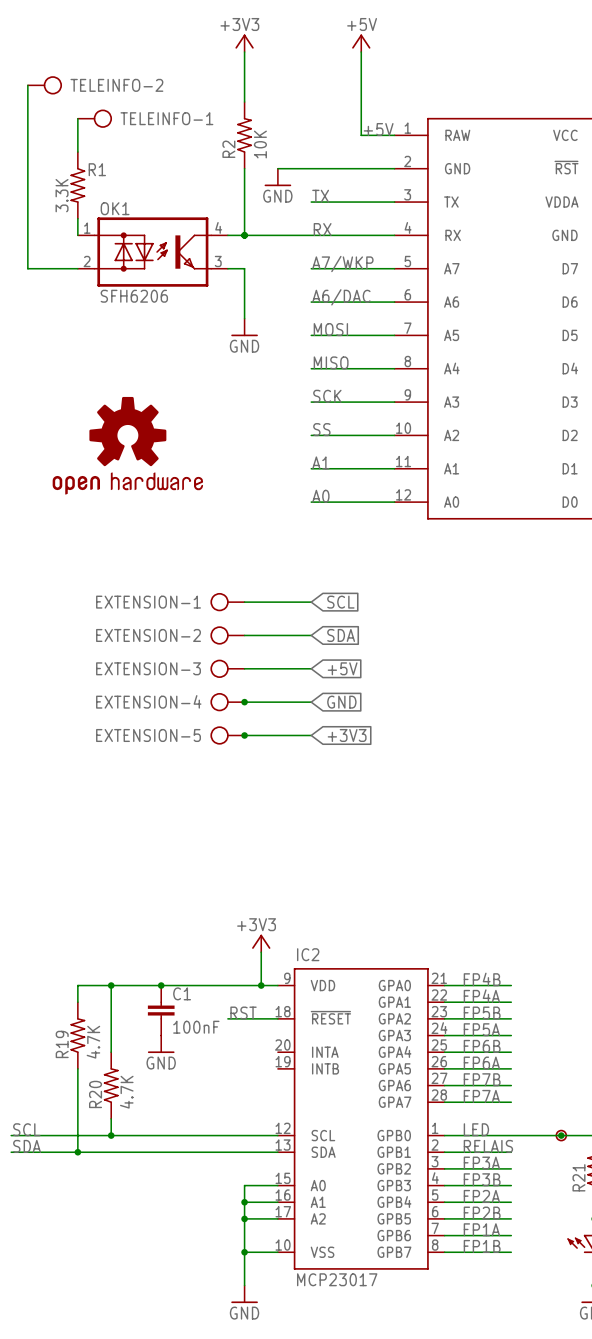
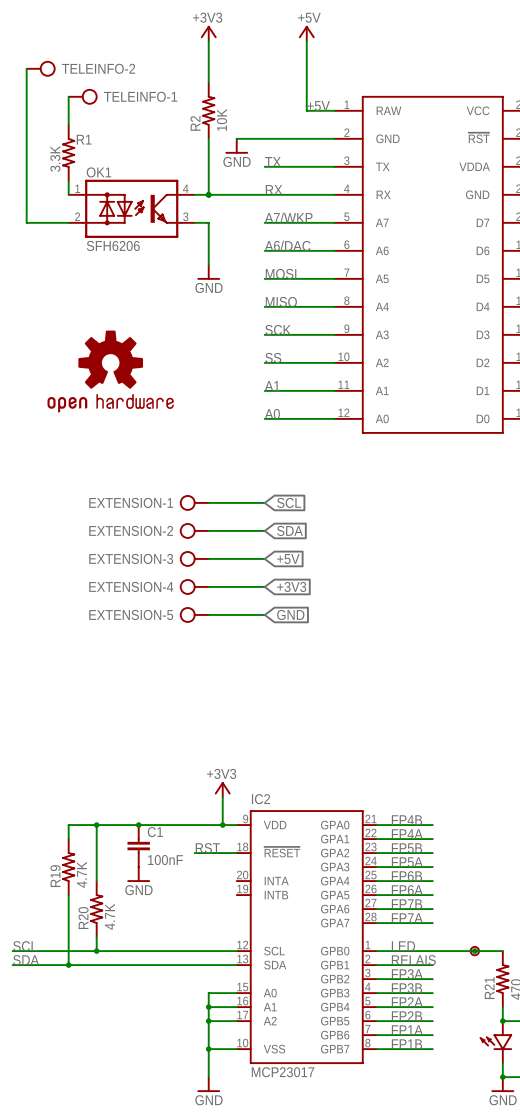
junction: (244, 702) -> none
global label: GND (341, 702) -> +3V3 (291, 586)
junction: (244, 735) -> none
global label: +3V3 (347, 735) -> GND (290, 614)

